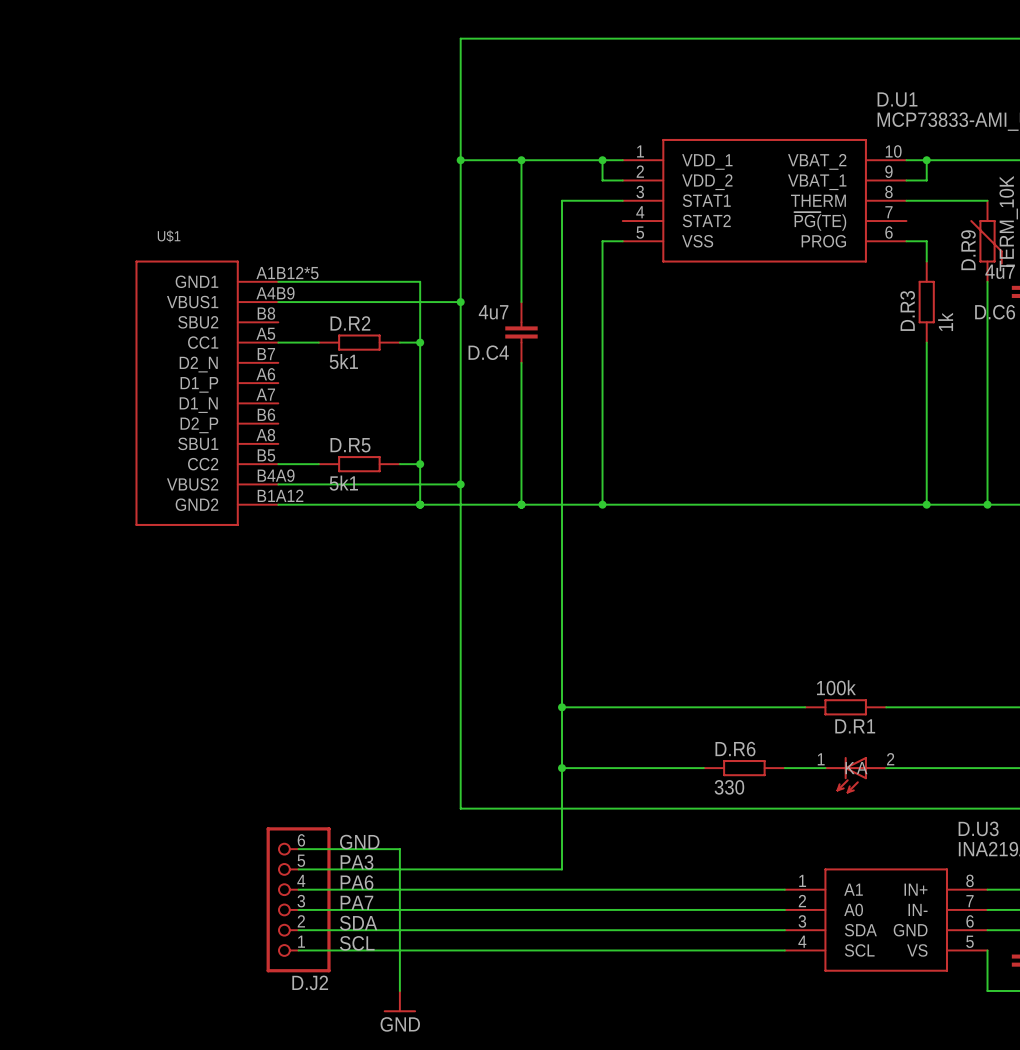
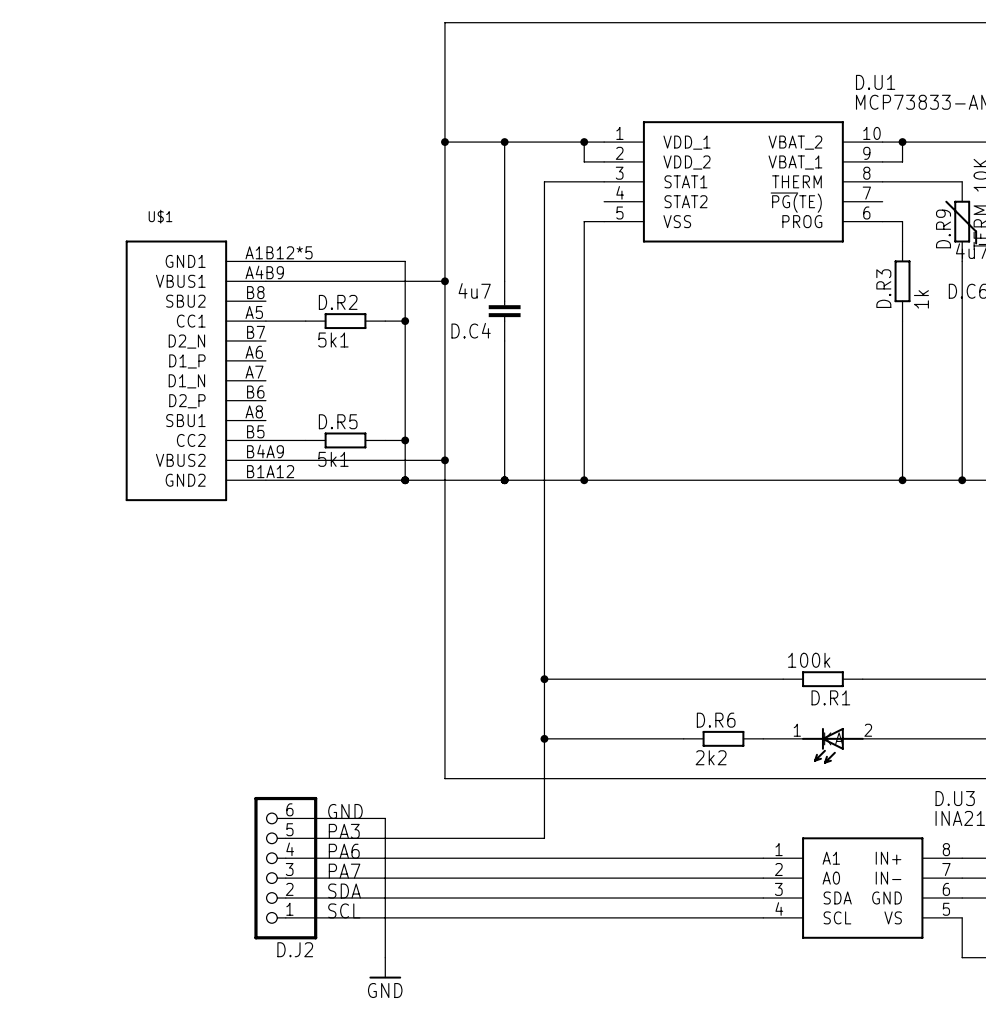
D.R6 value: 330 (729, 787) -> 2k2 (711, 757)

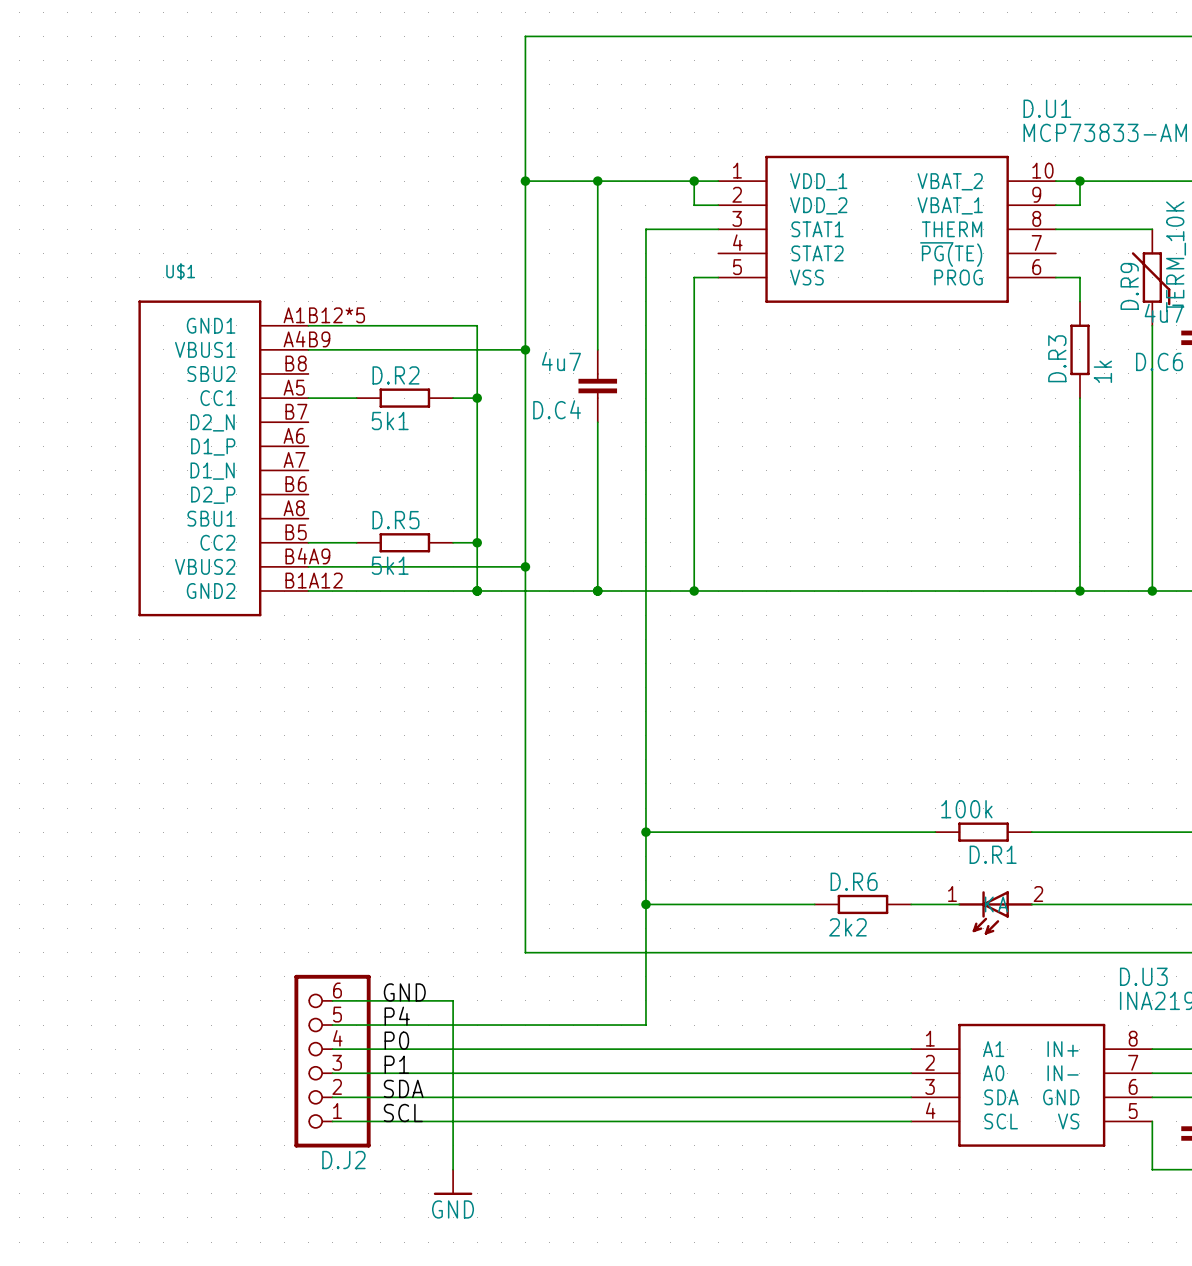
label: PA3 (344, 831) -> P4 (397, 1016)
label: PA6 (344, 851) -> P0 (396, 1040)
label: PA7 (344, 871) -> P1 (396, 1064)

